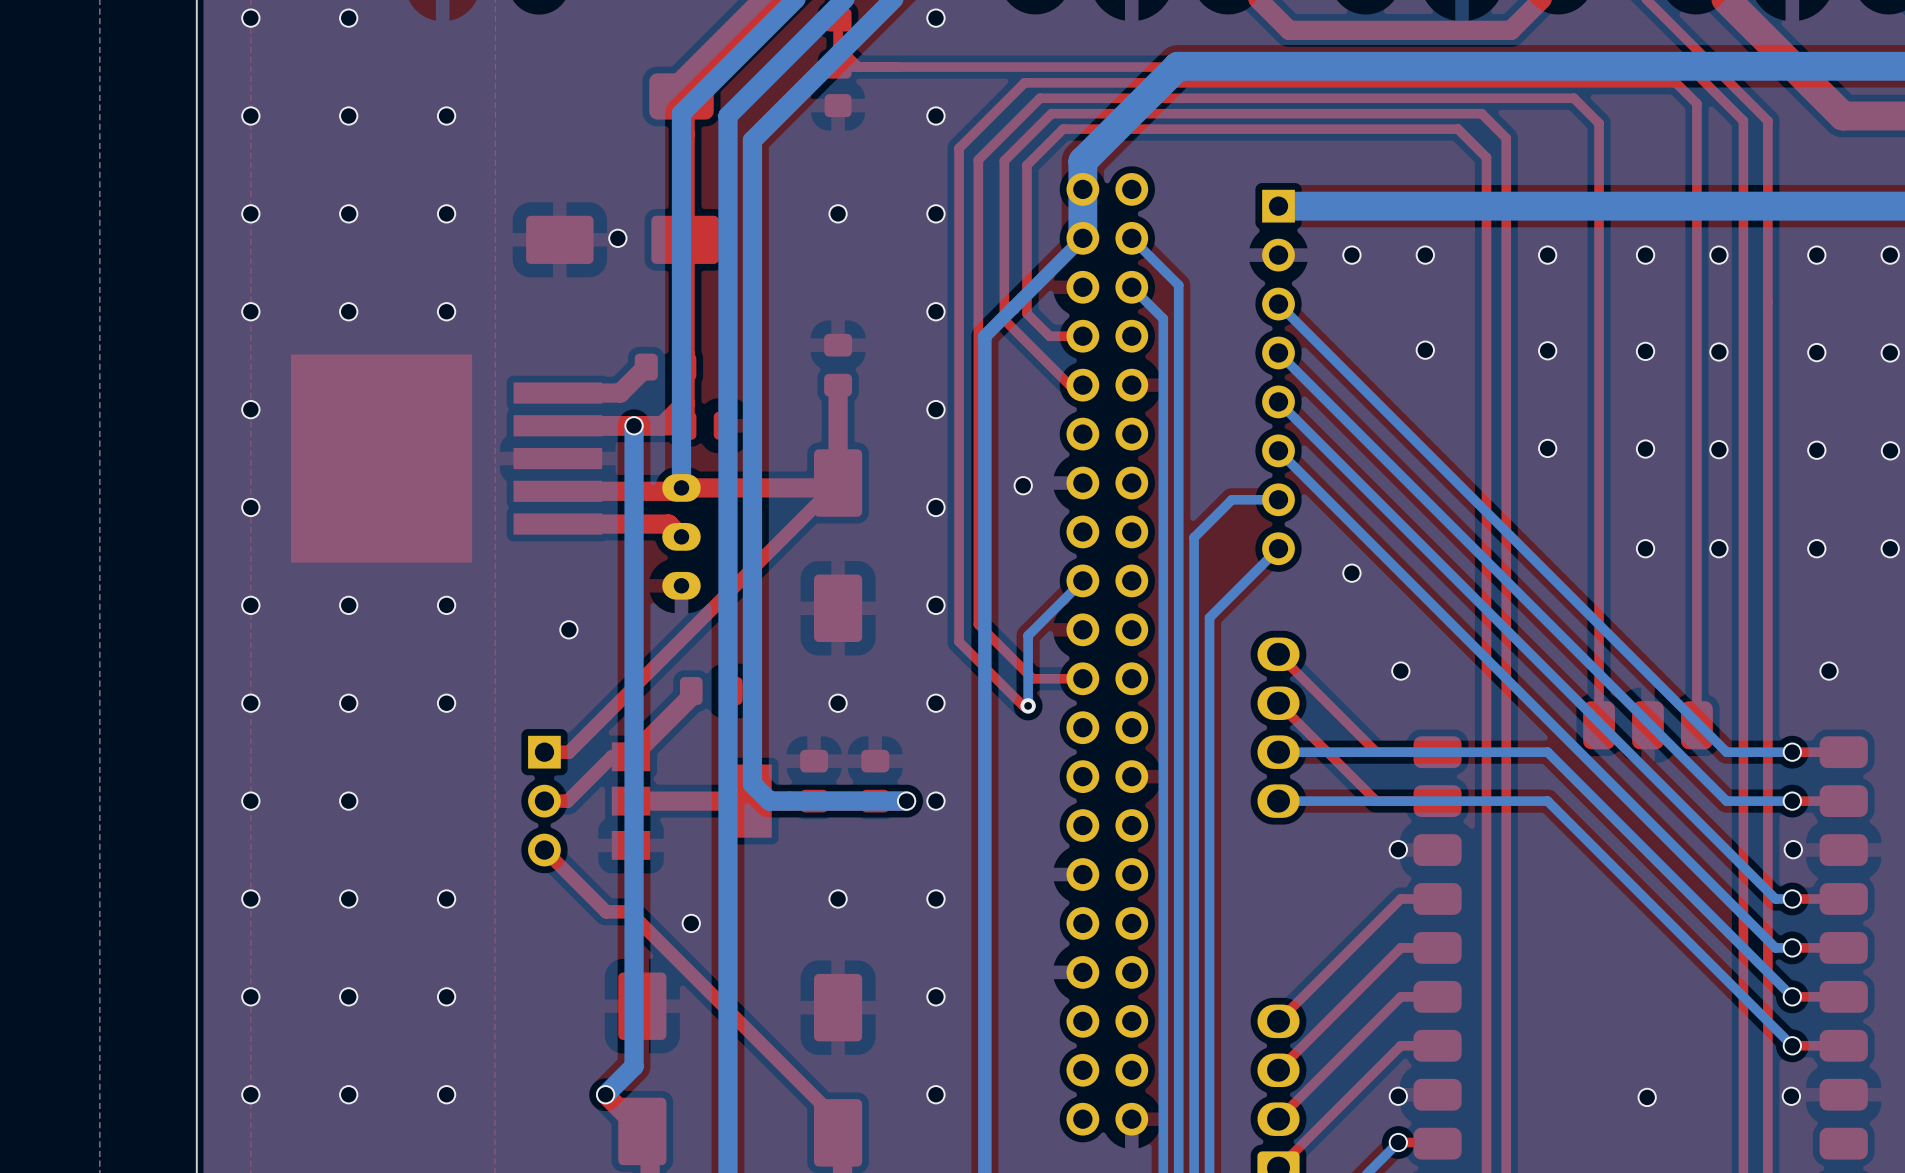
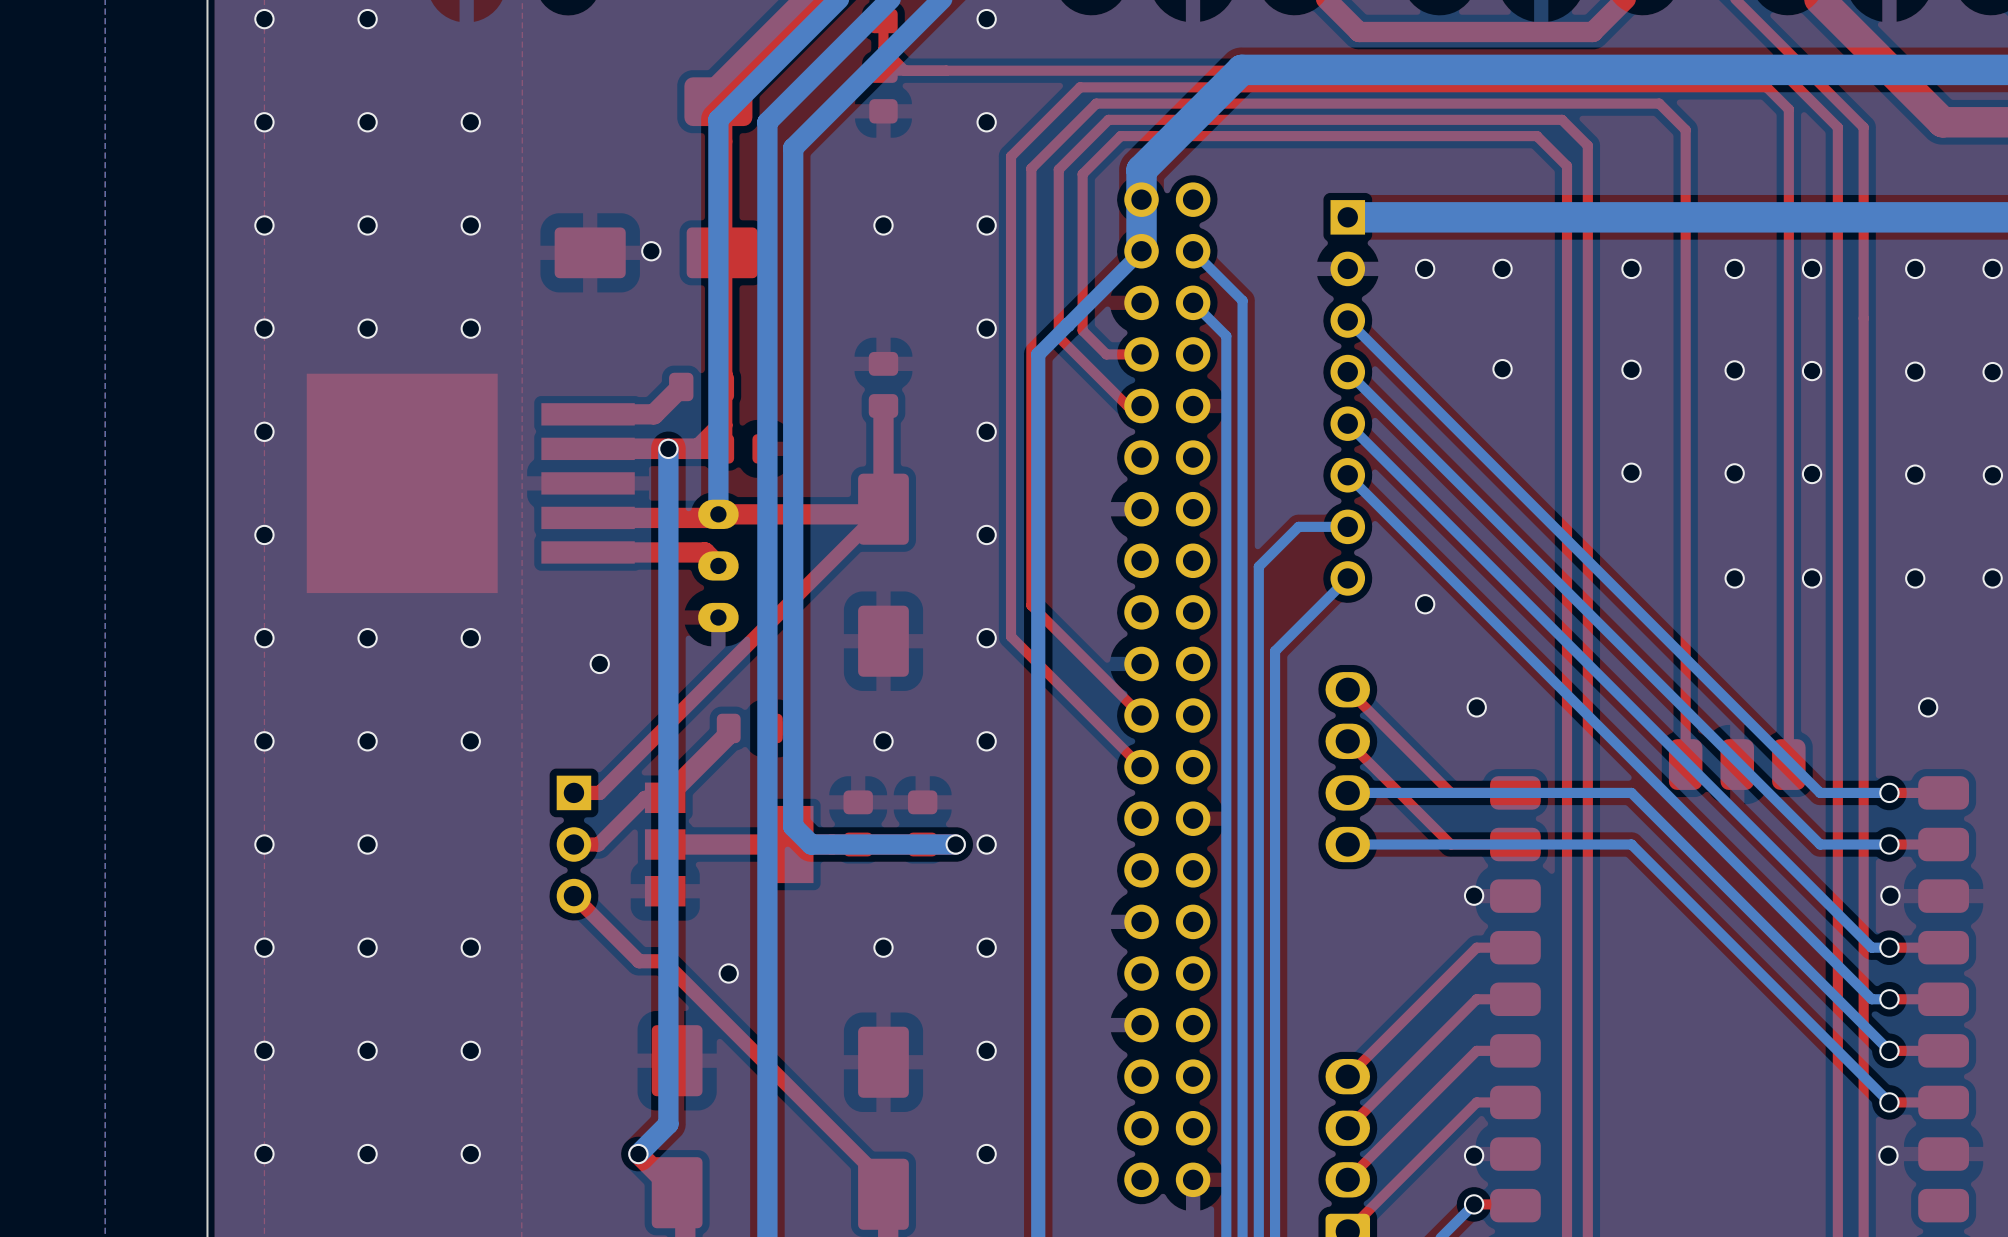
via: (1023, 485) -> none
top track: (978, 574) (978, 624) (1032, 678) (1082, 678) -> (1031, 605) (1141, 715)
bottom track: (1082, 580) (1028, 635) (1028, 705) -> none
top track: (959, 603) (959, 641) (1023, 705) (1028, 705) -> (1011, 636) (1141, 767)
via: (1028, 705) -> none
via: (1647, 1097) -> none

